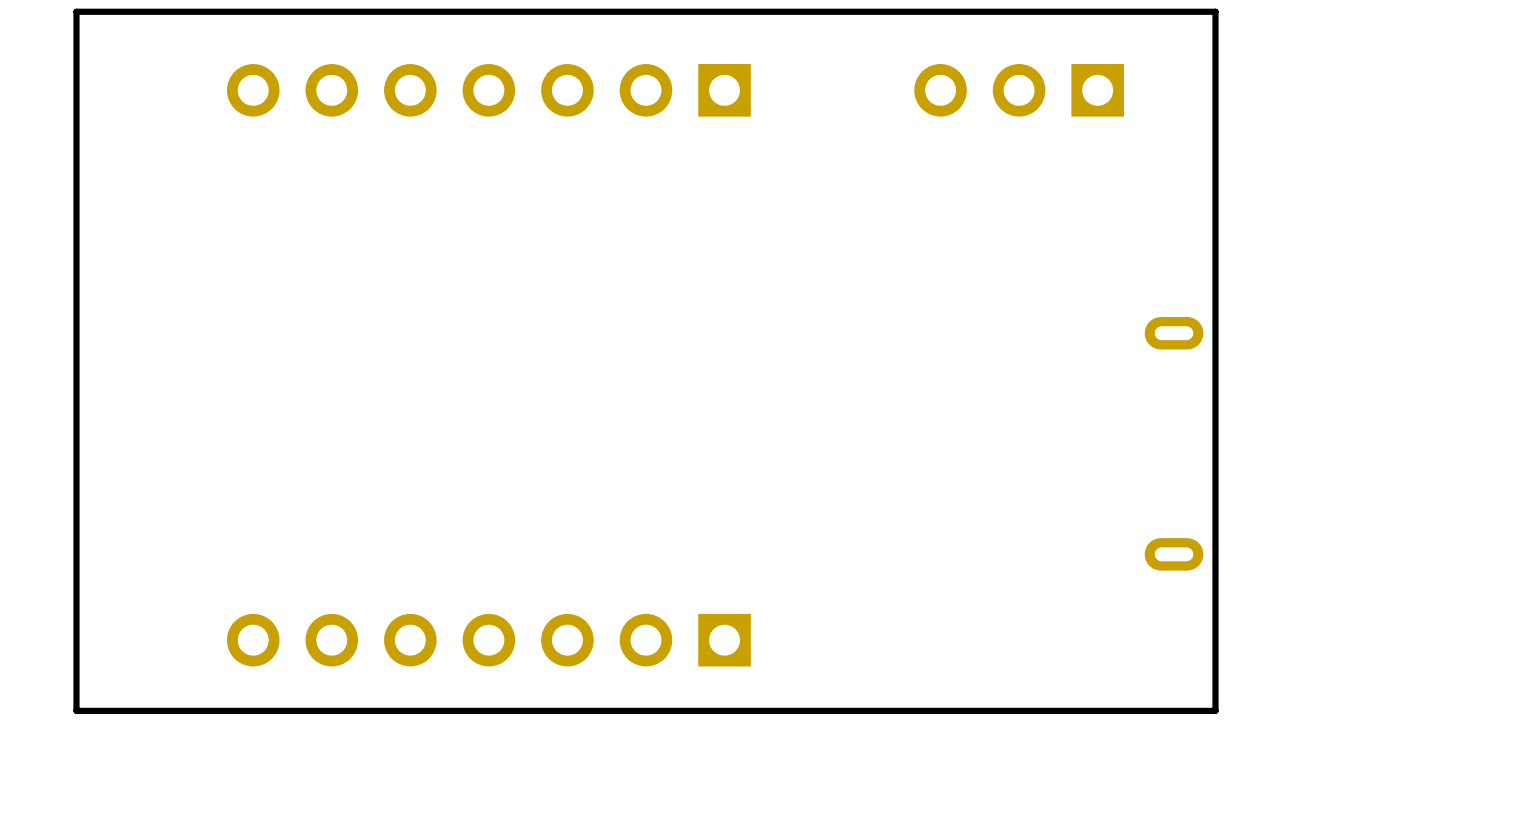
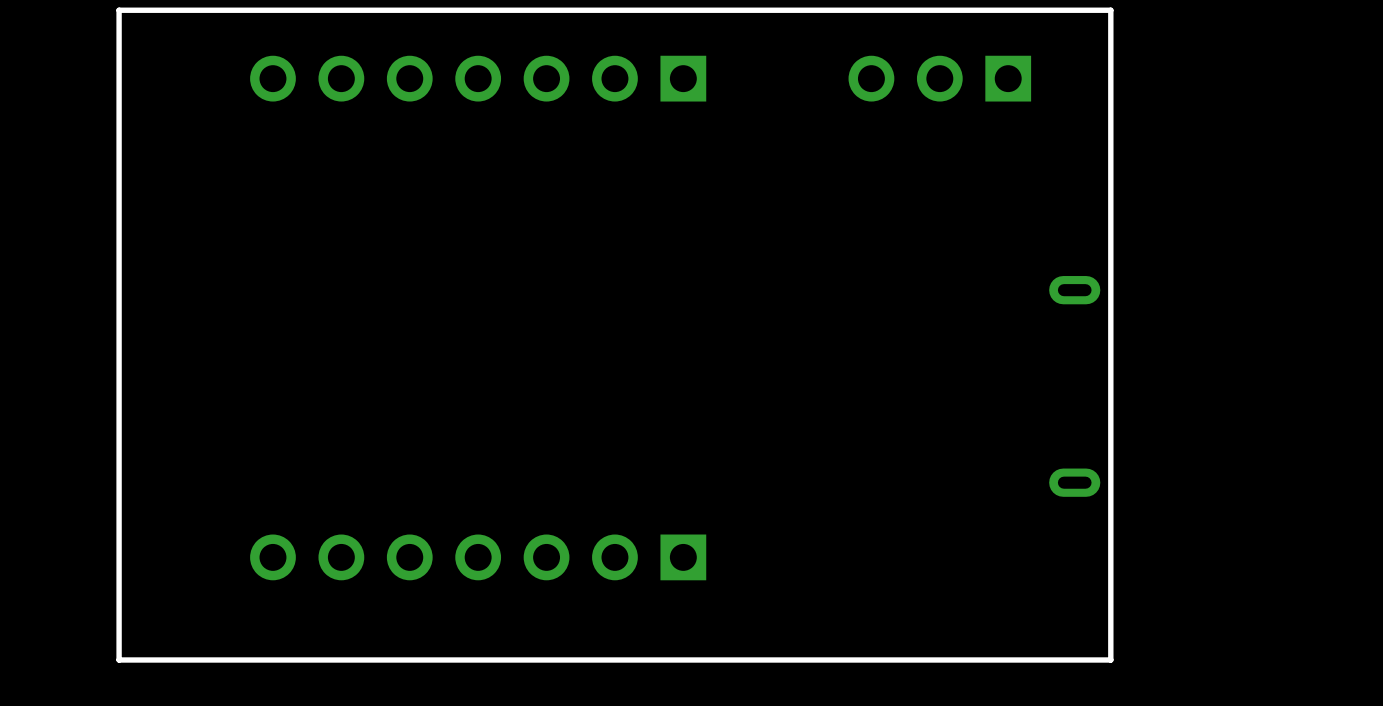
board edge: (1215, 710) (76, 710) -> (1110, 618) (1110, 659) (119, 659) (119, 618)

